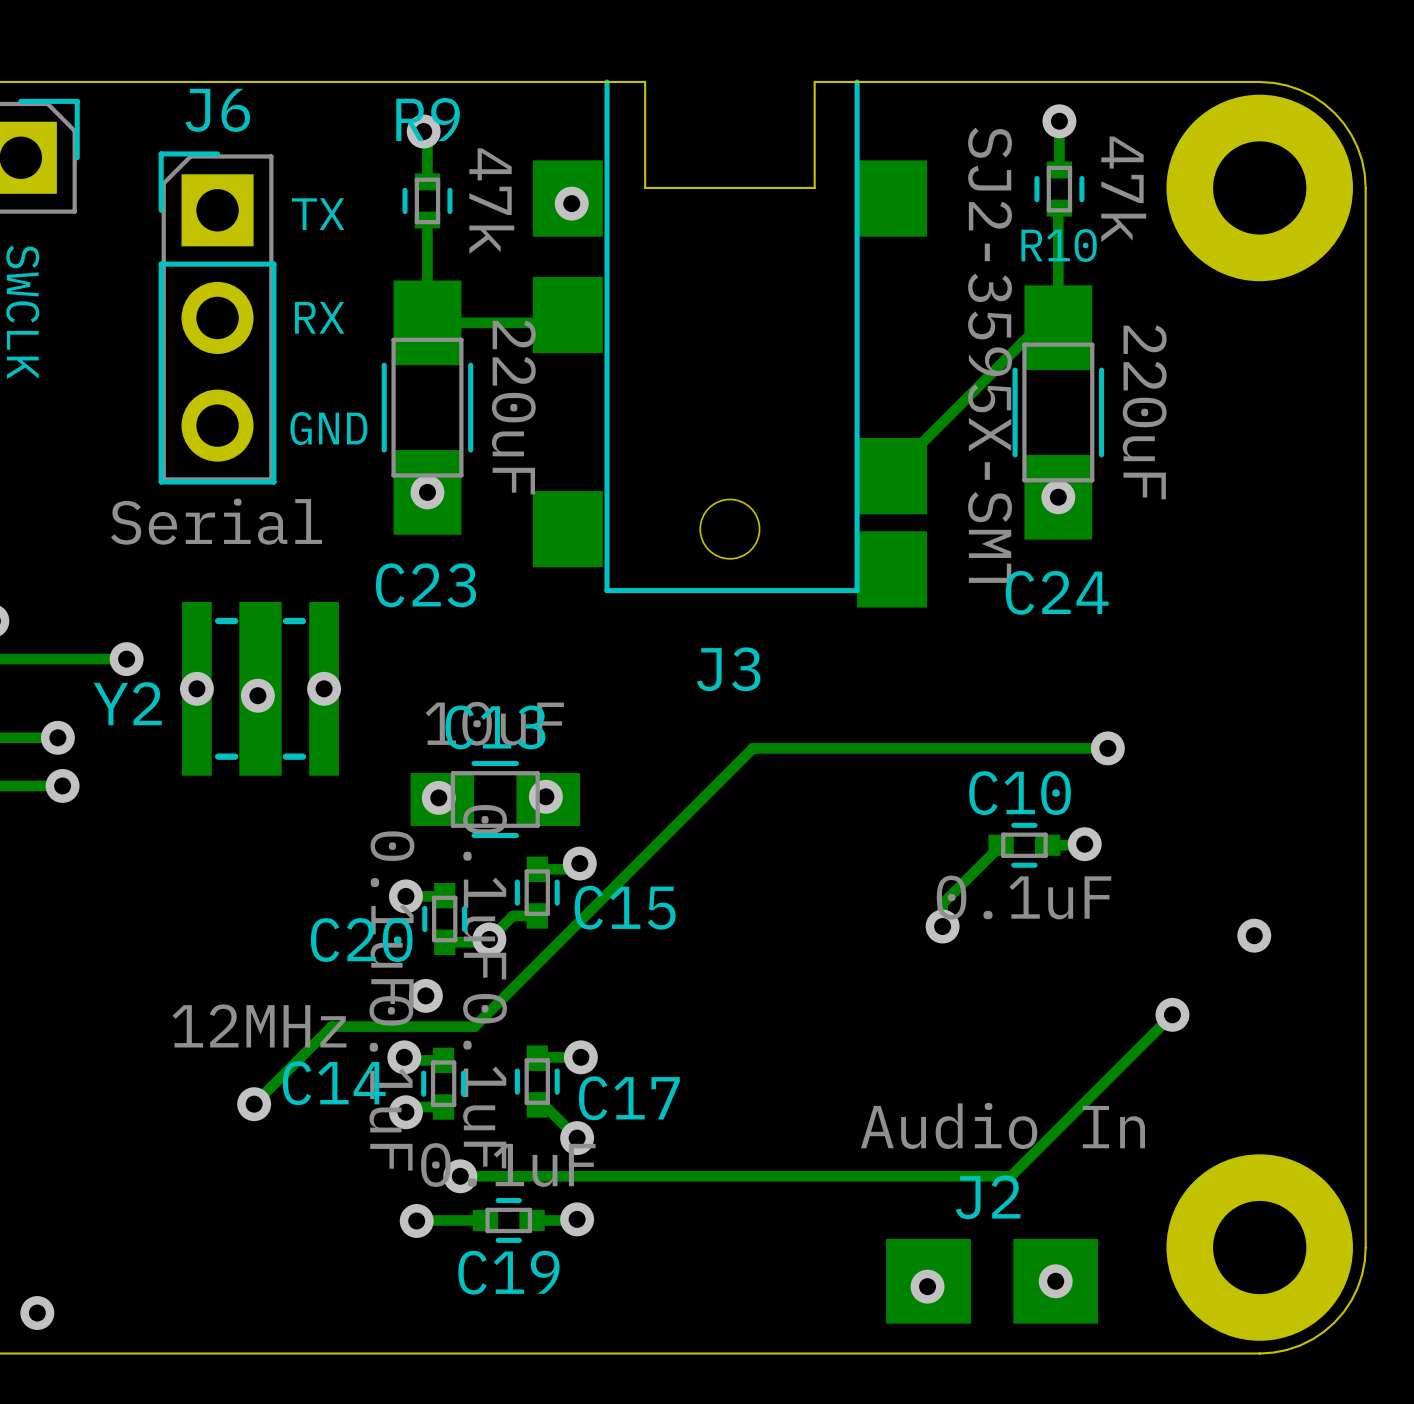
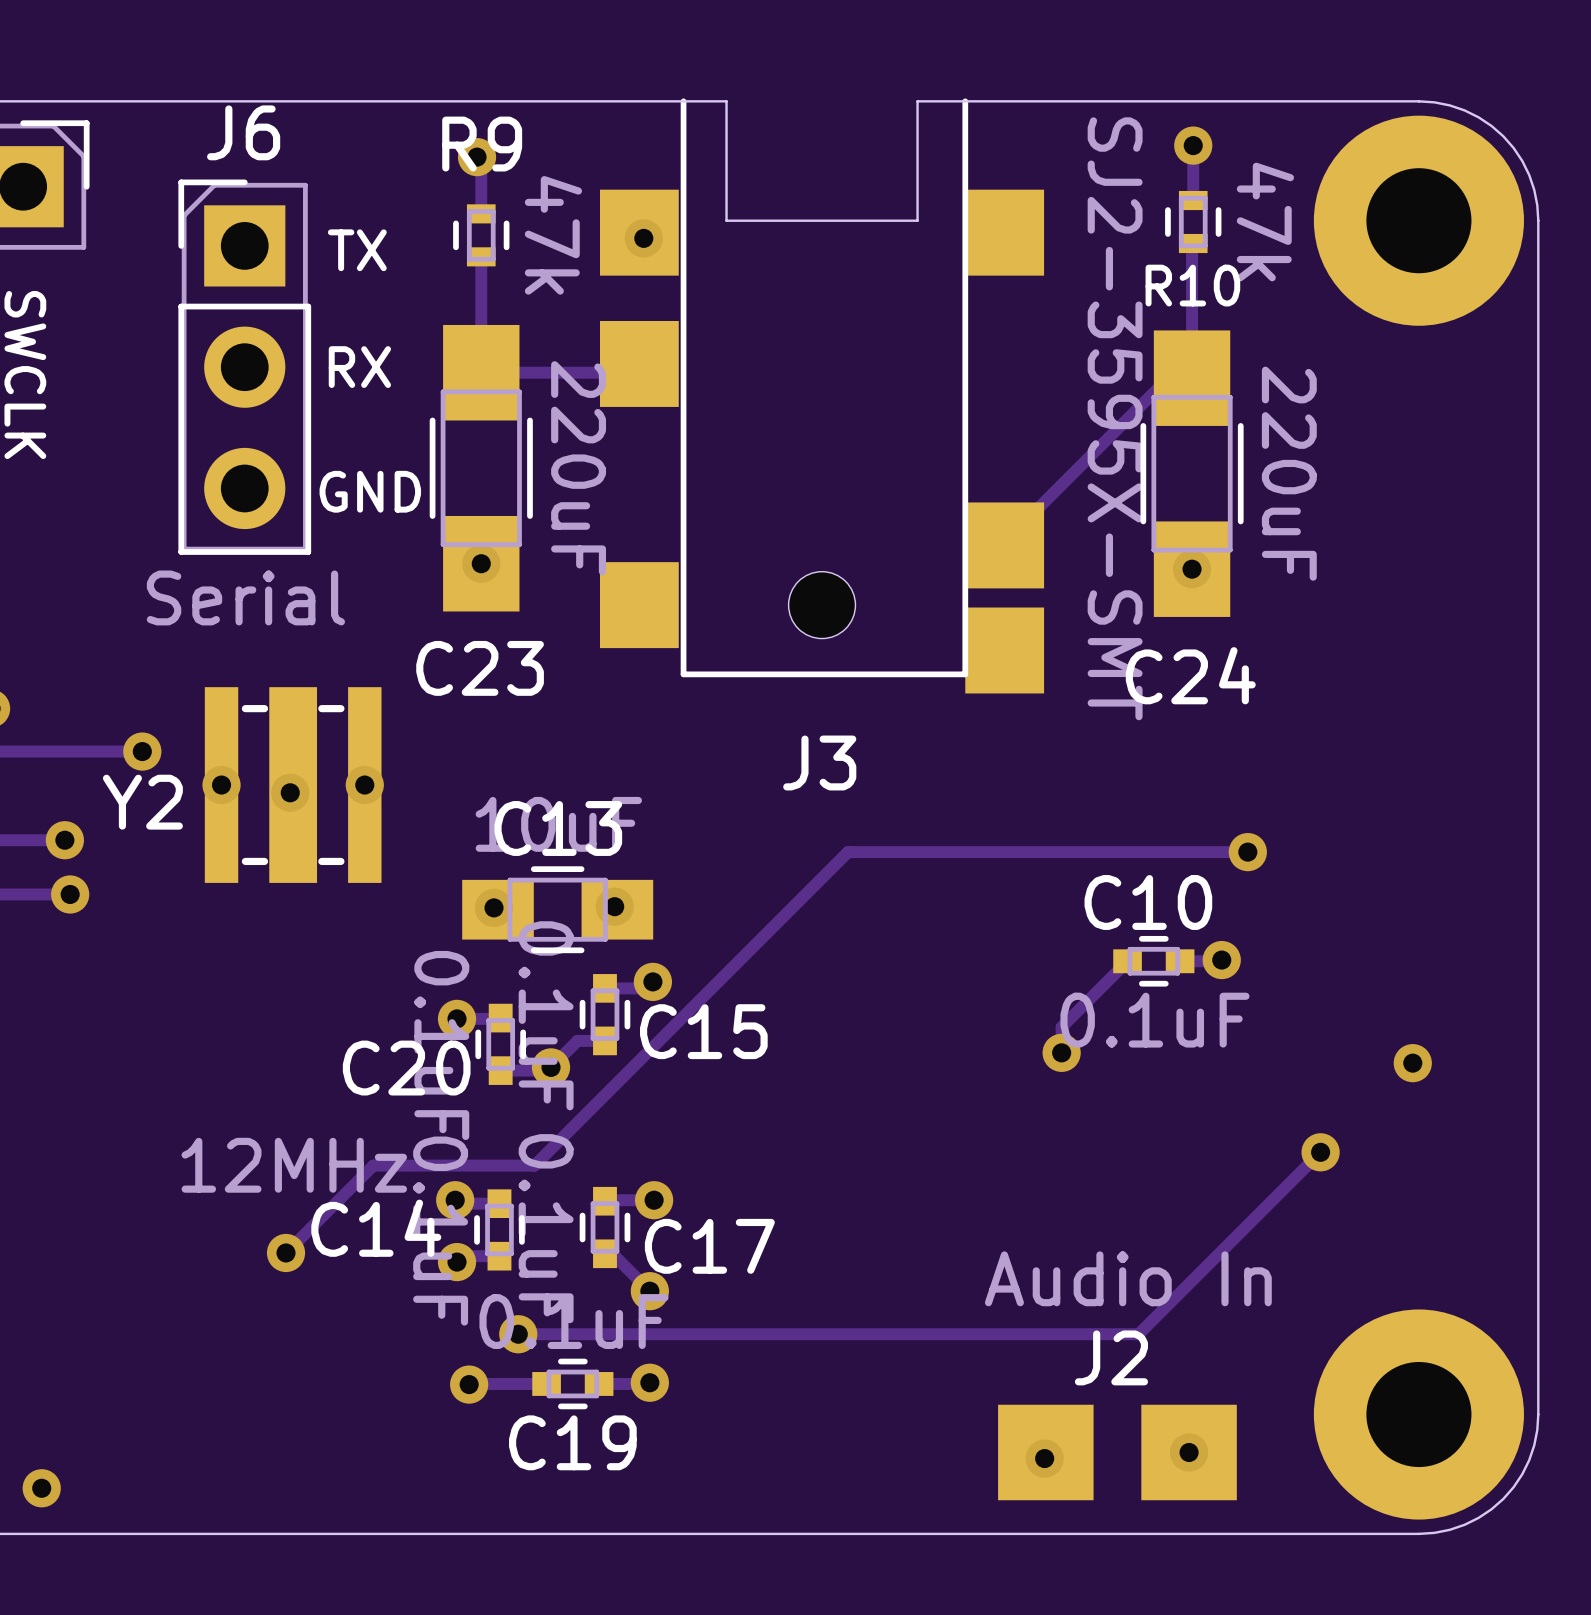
via: (425, 995) -> none

